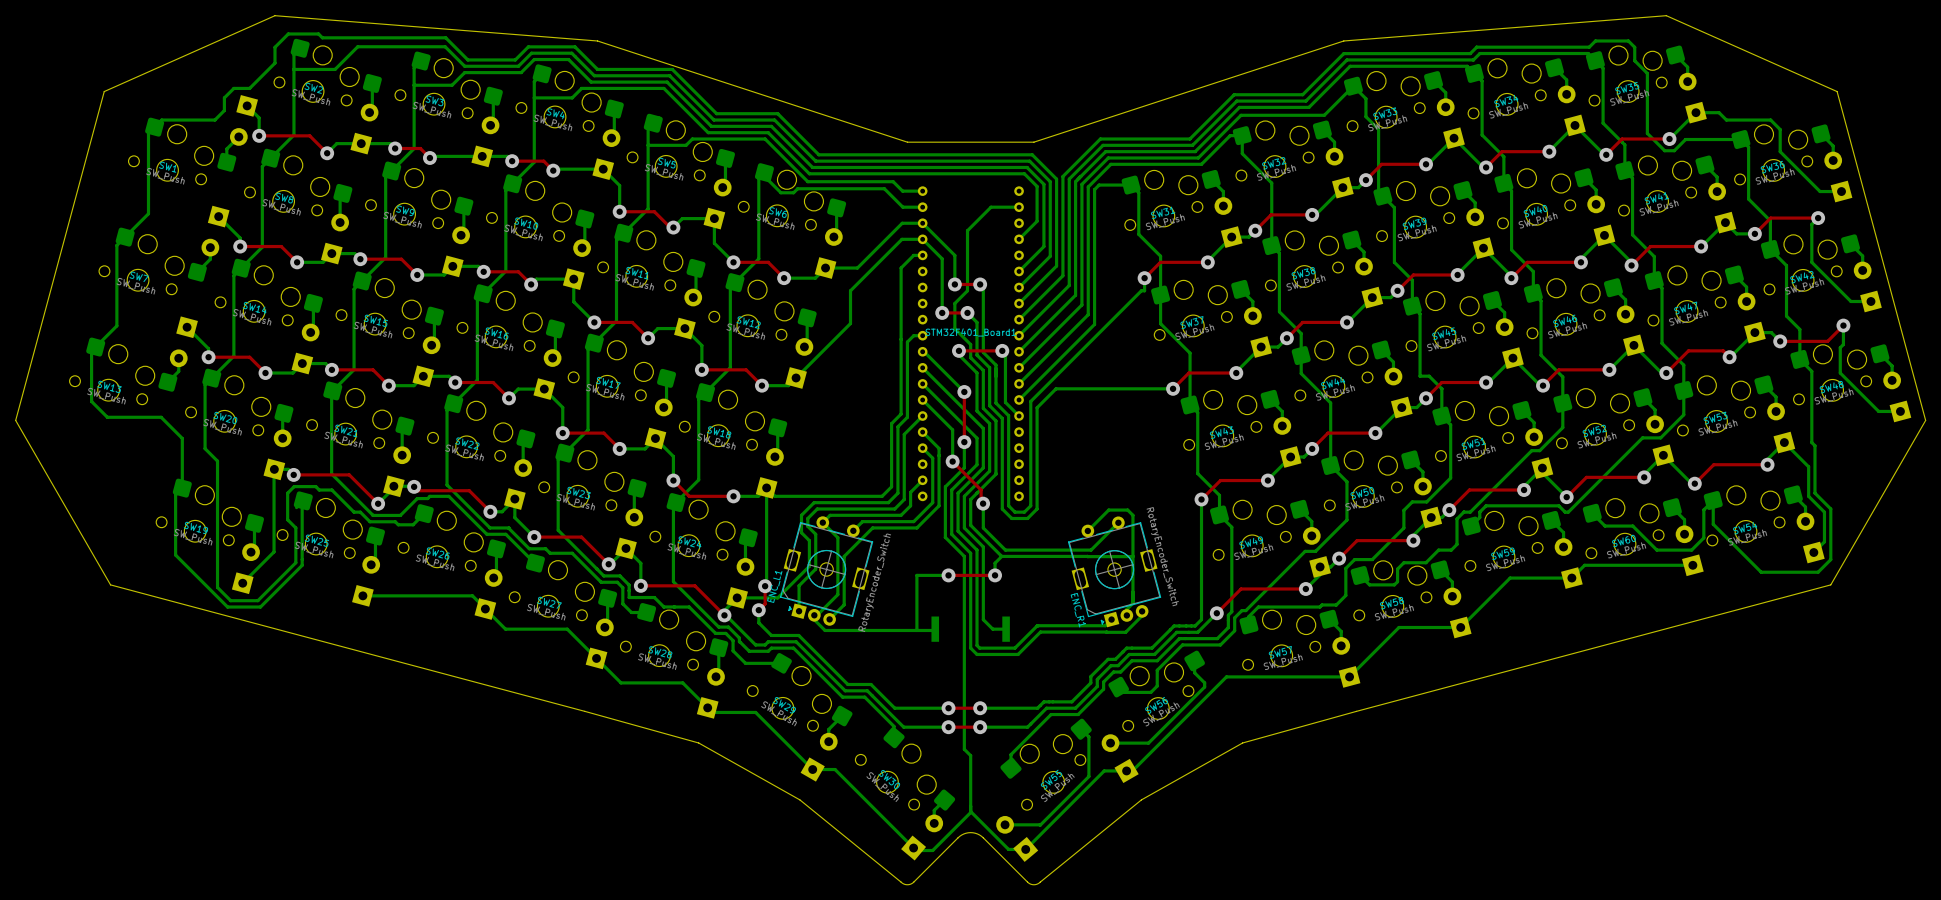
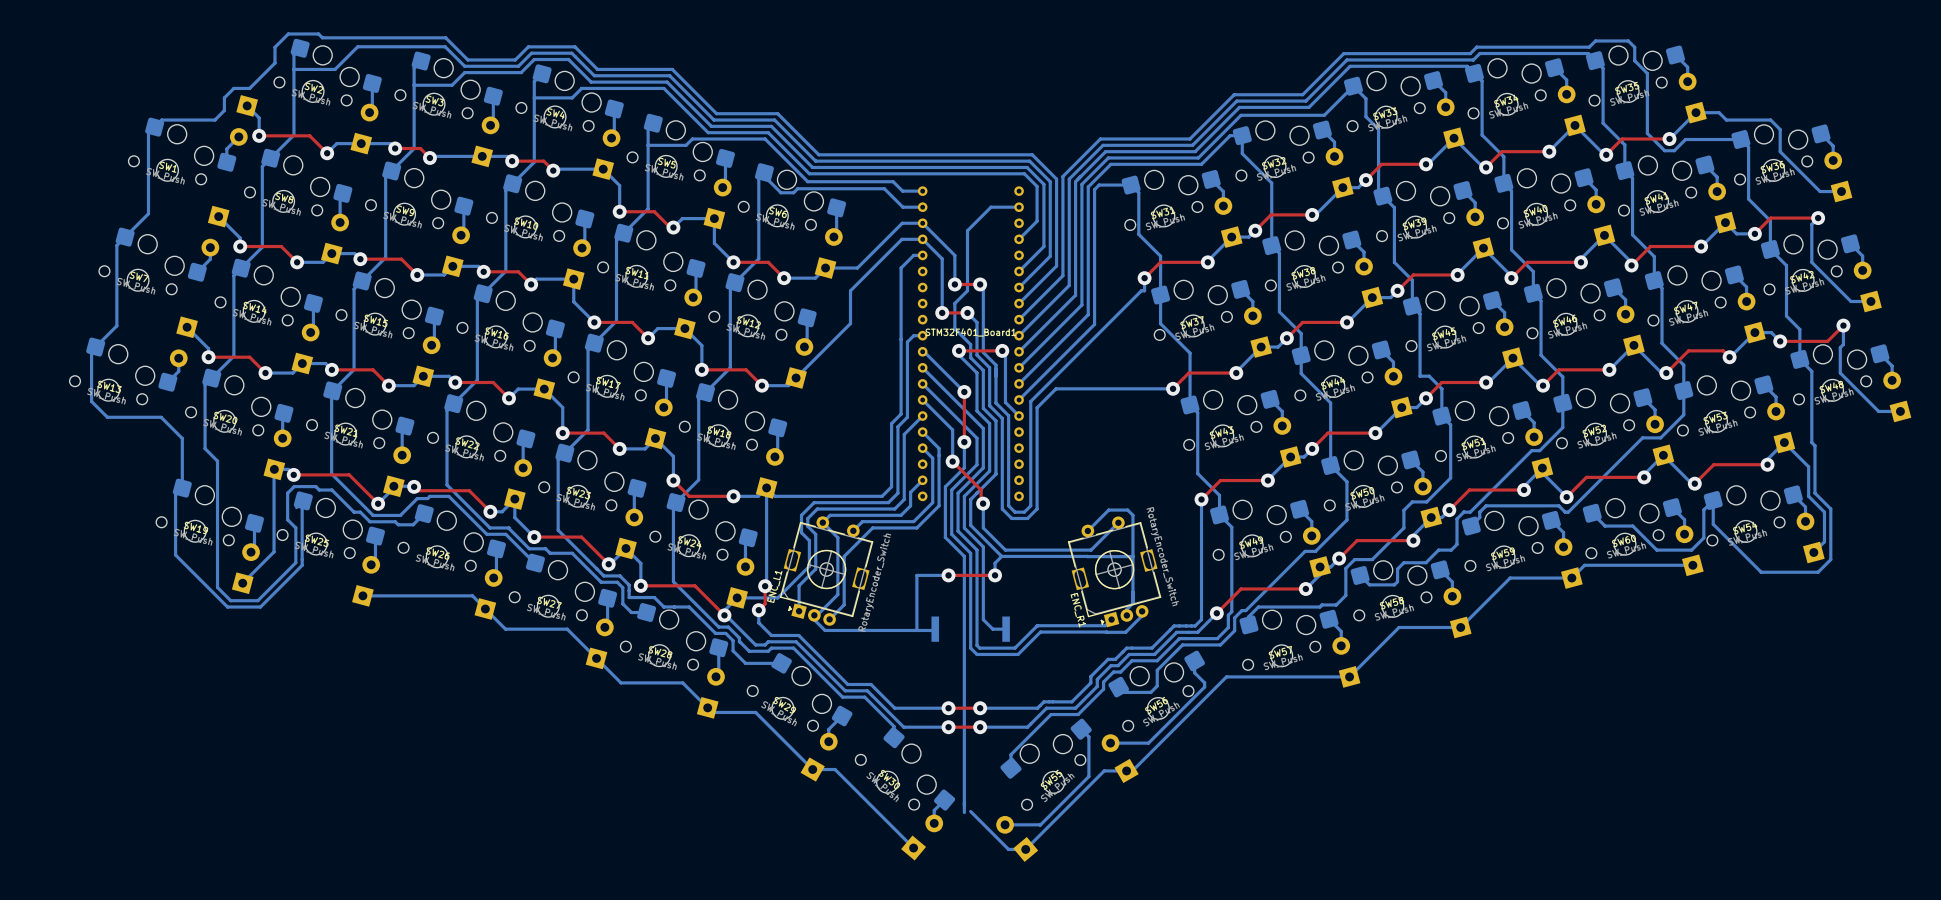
board edge: (274, 15) (104, 91) (15, 420) (110, 584) (698, 742) (799, 799) (905, 884) (913, 882) (959, 836) (970, 832) (981, 836) (1028, 882) (1036, 884) (1141, 799) (1242, 742) (1830, 584) (1925, 420) (1837, 91) (1666, 15) (1343, 40) (1033, 142) (907, 142) (597, 40) (274, 15) -> none
bottom track: (964, 749) (970, 755) (970, 812) (932, 850) (916, 850) (913, 848) -> (964, 749) (964, 812)

